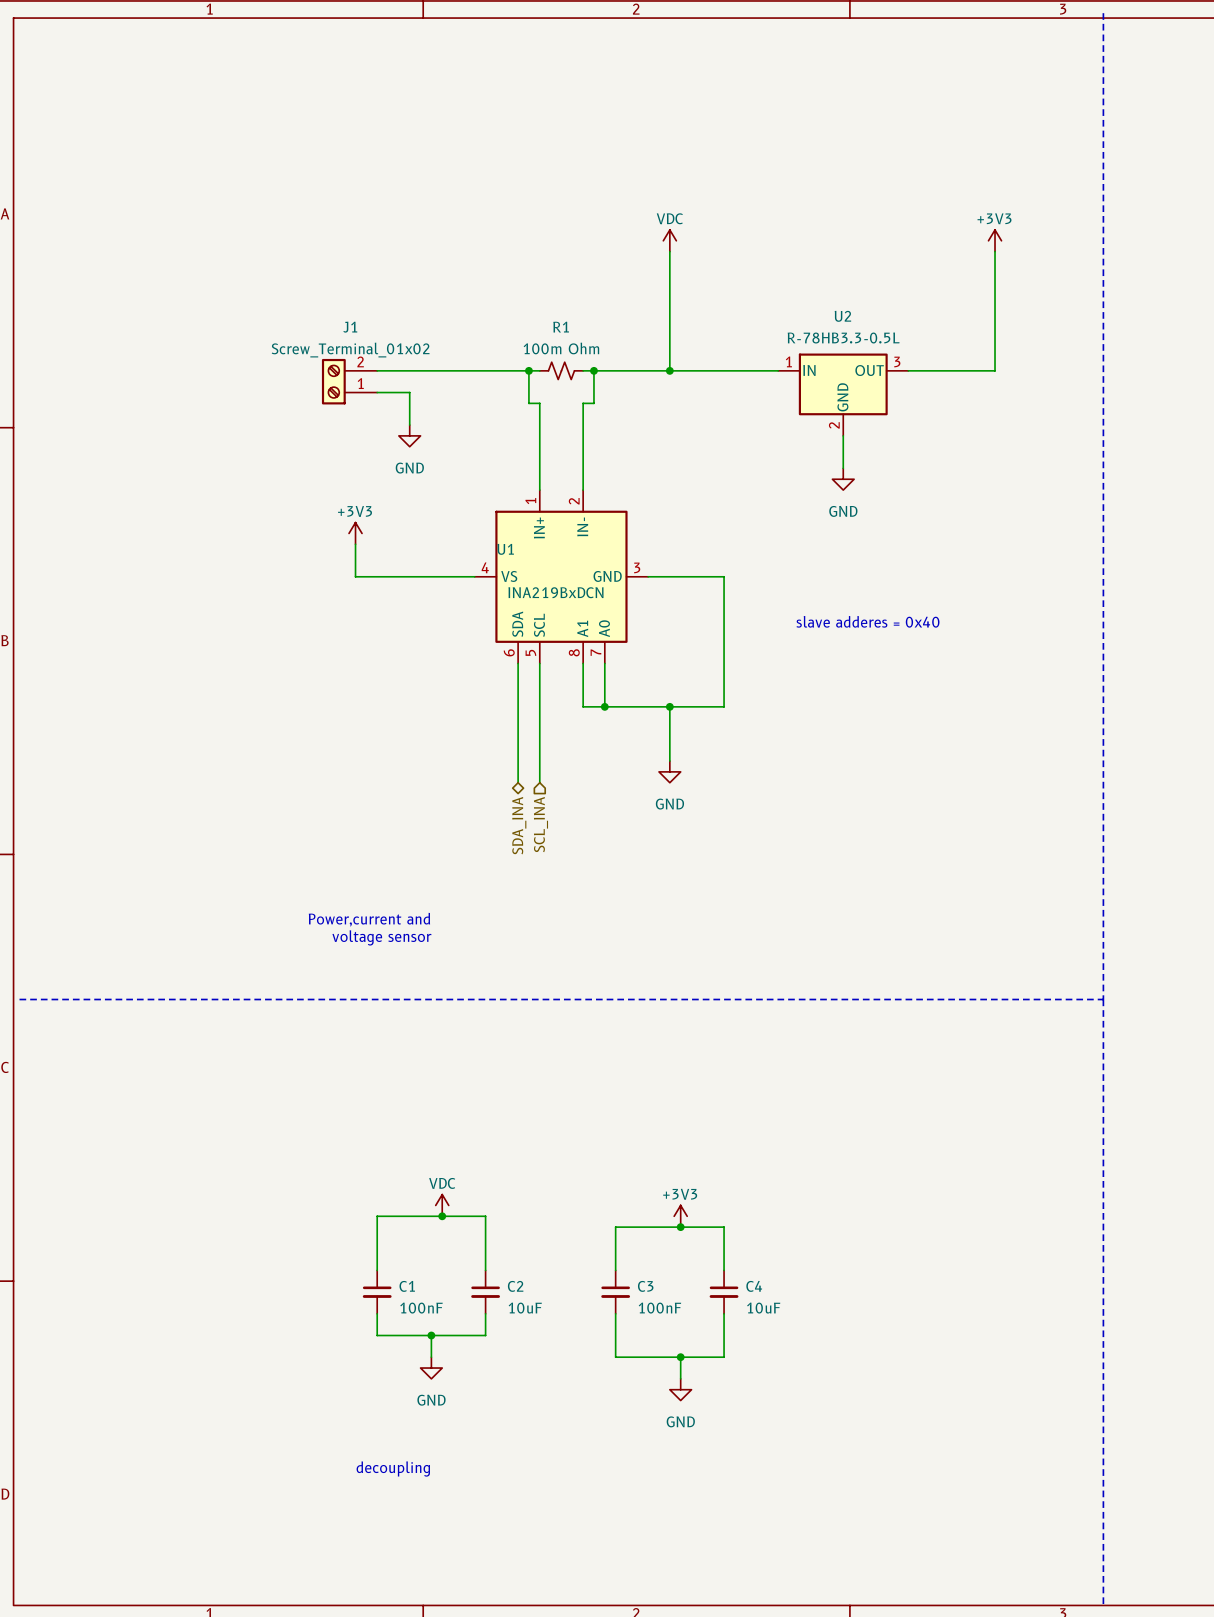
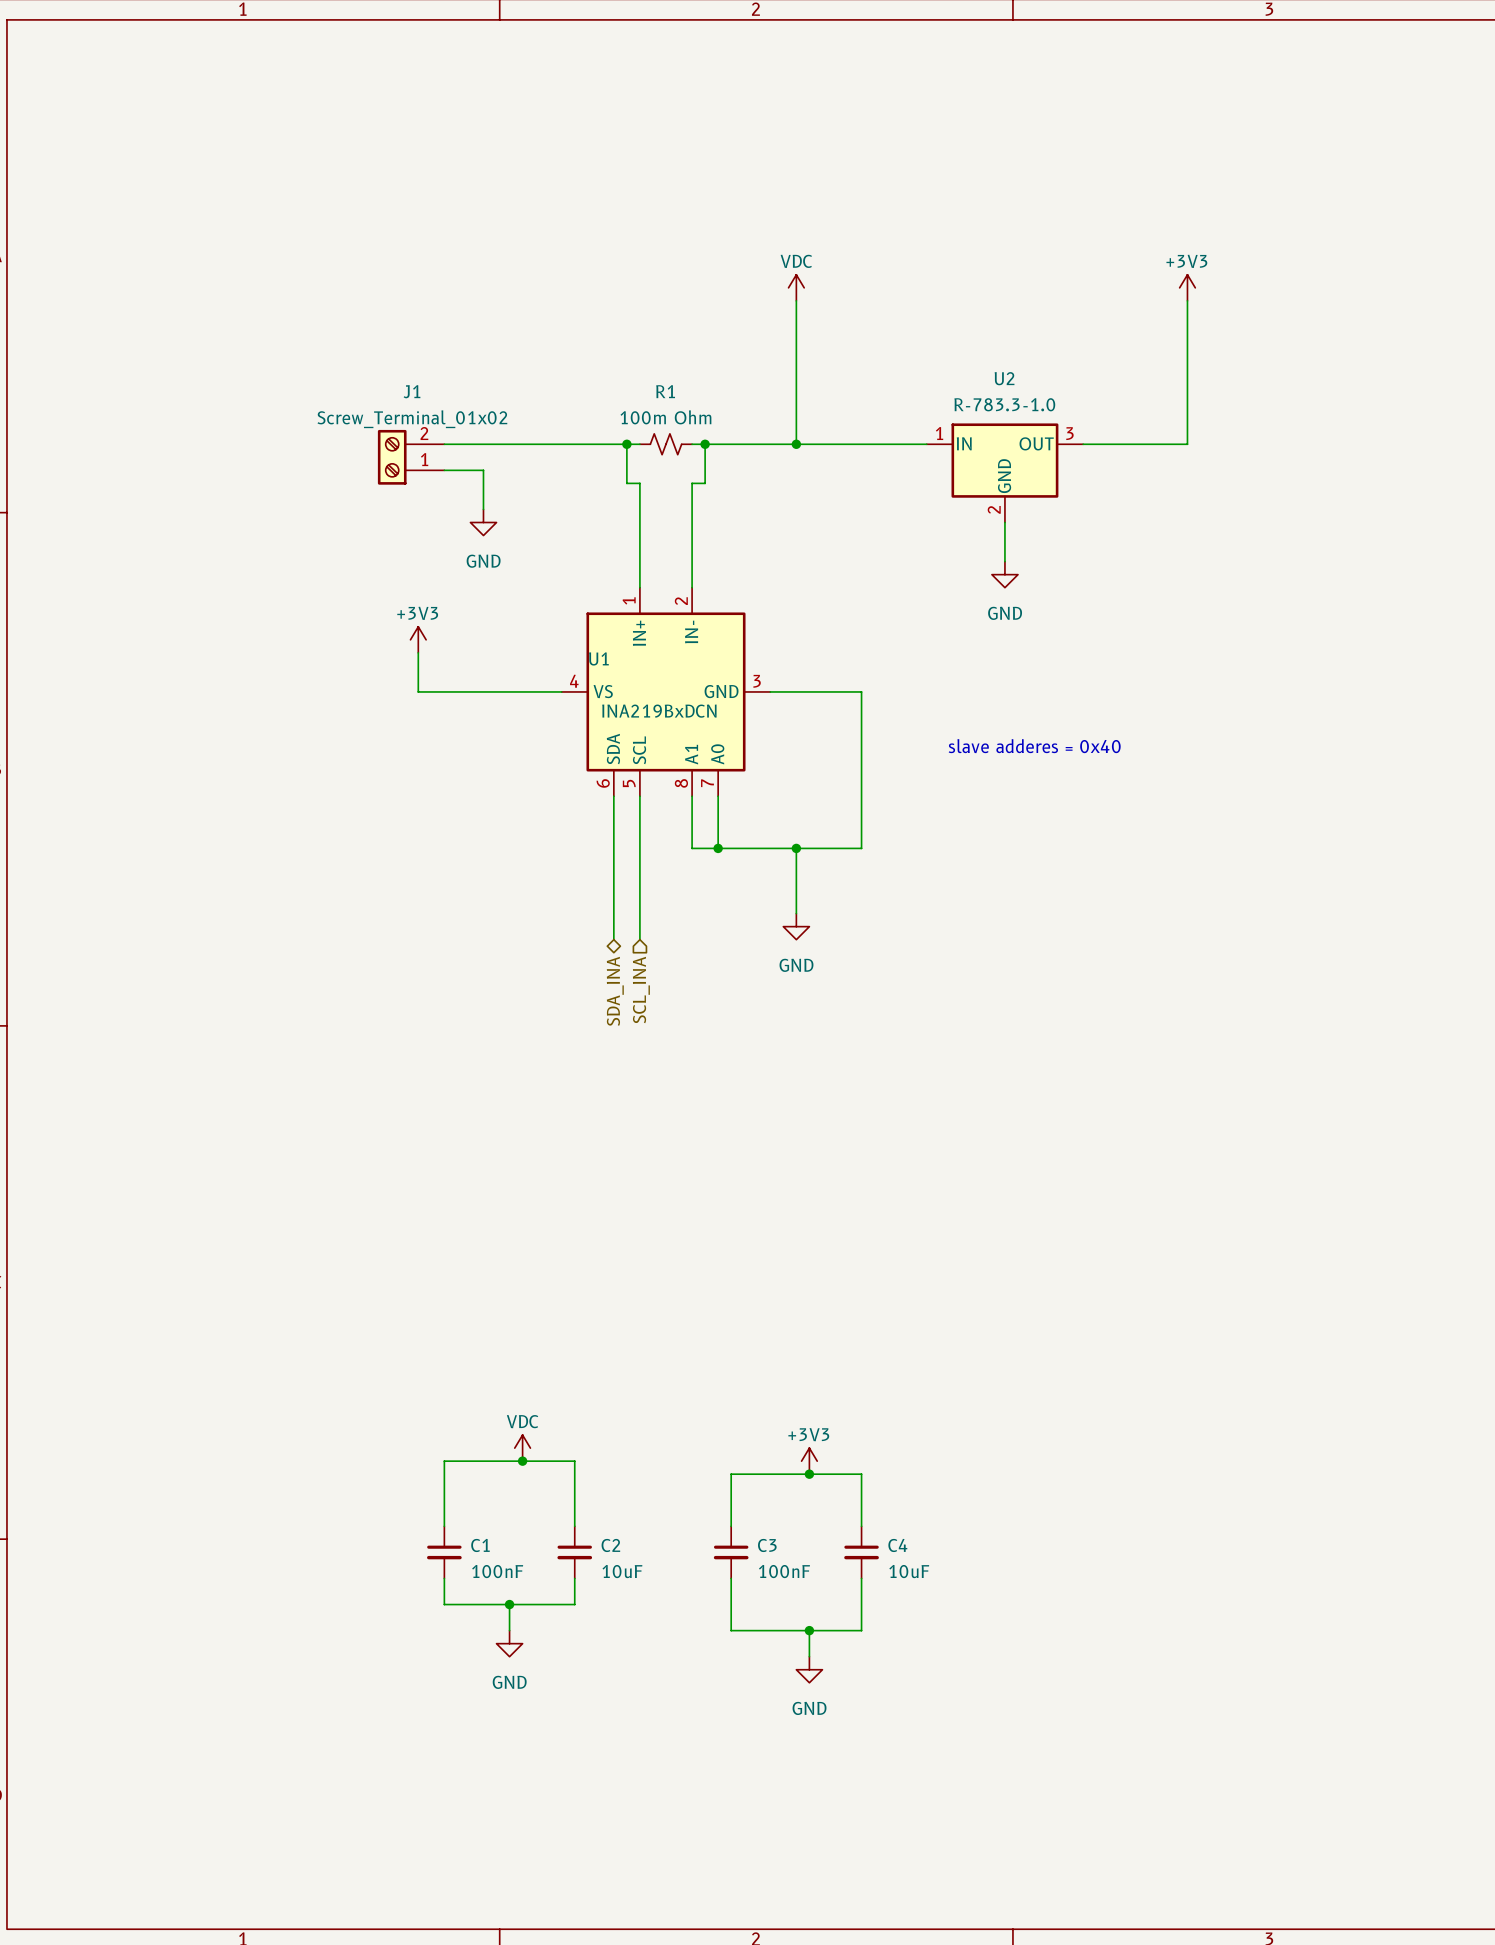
line: (1103, 13) (1103, 1606) -> none
U2 value: R-78HB3.3-0.5L (843, 338) -> R-783.3-1.0 (1004, 404)
text: Power,current and (369, 919) -> none
text: voltage sensor (381, 937) -> none
line: (19, 999) (1103, 999) -> none
text: decoupling (393, 1469) -> none

